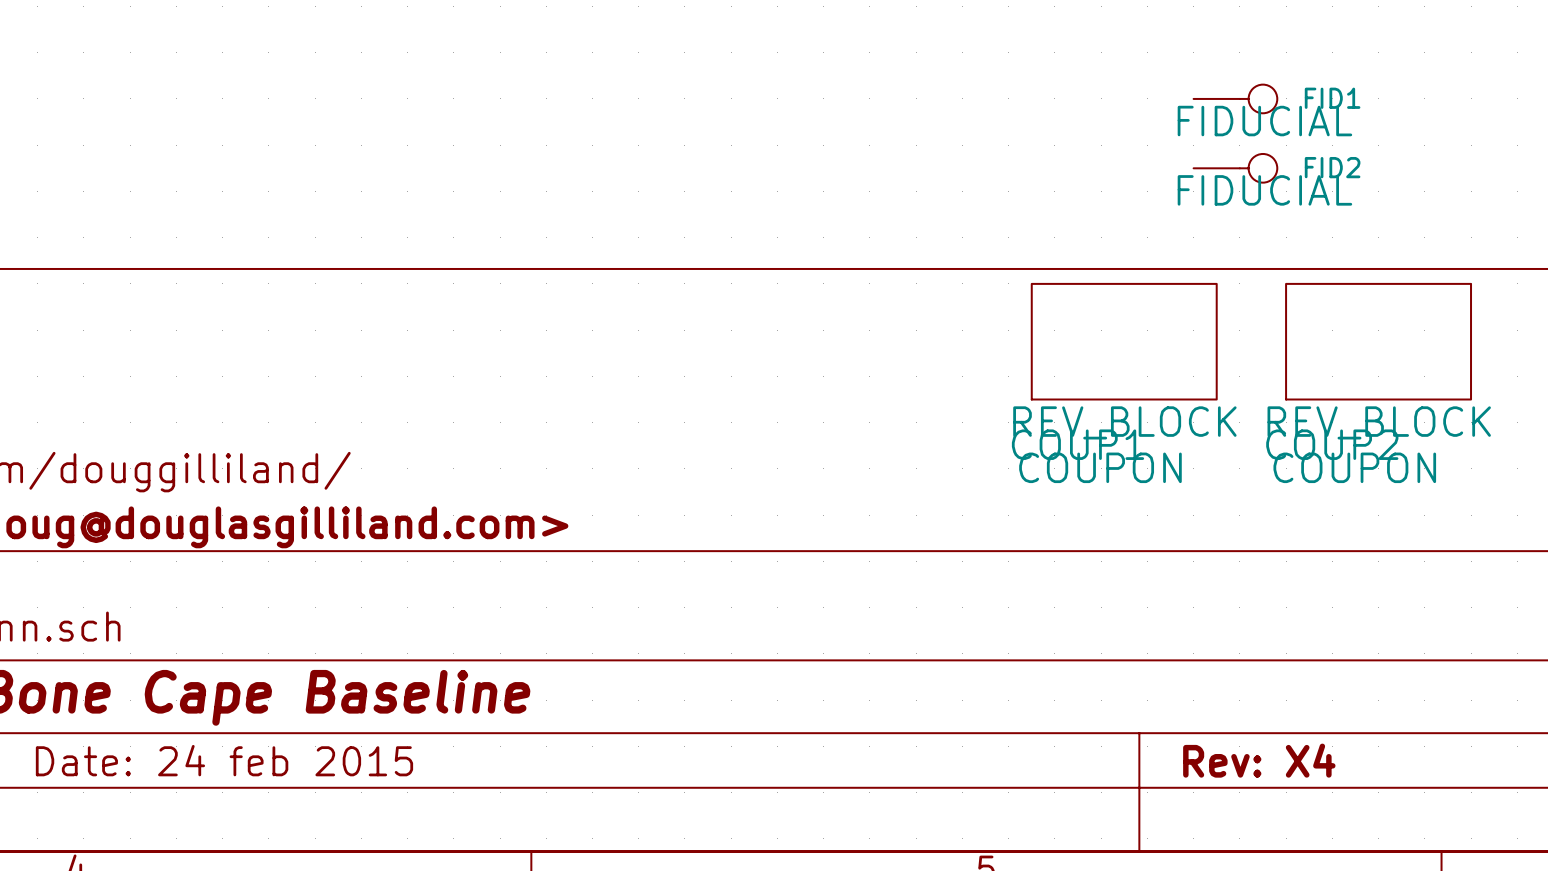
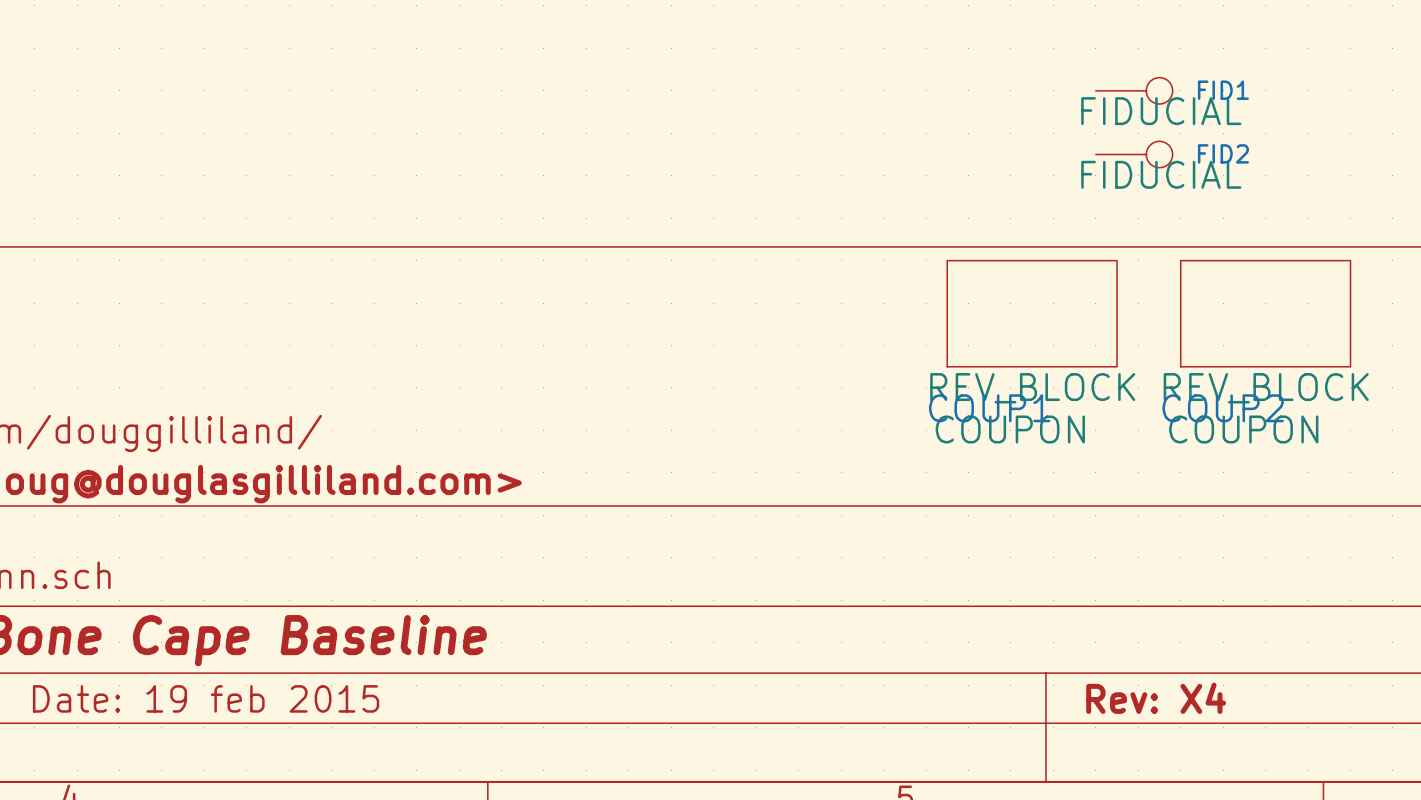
title block: Date: 24 feb 2015 (224, 760) -> Date: 19 feb 2015 (206, 698)

